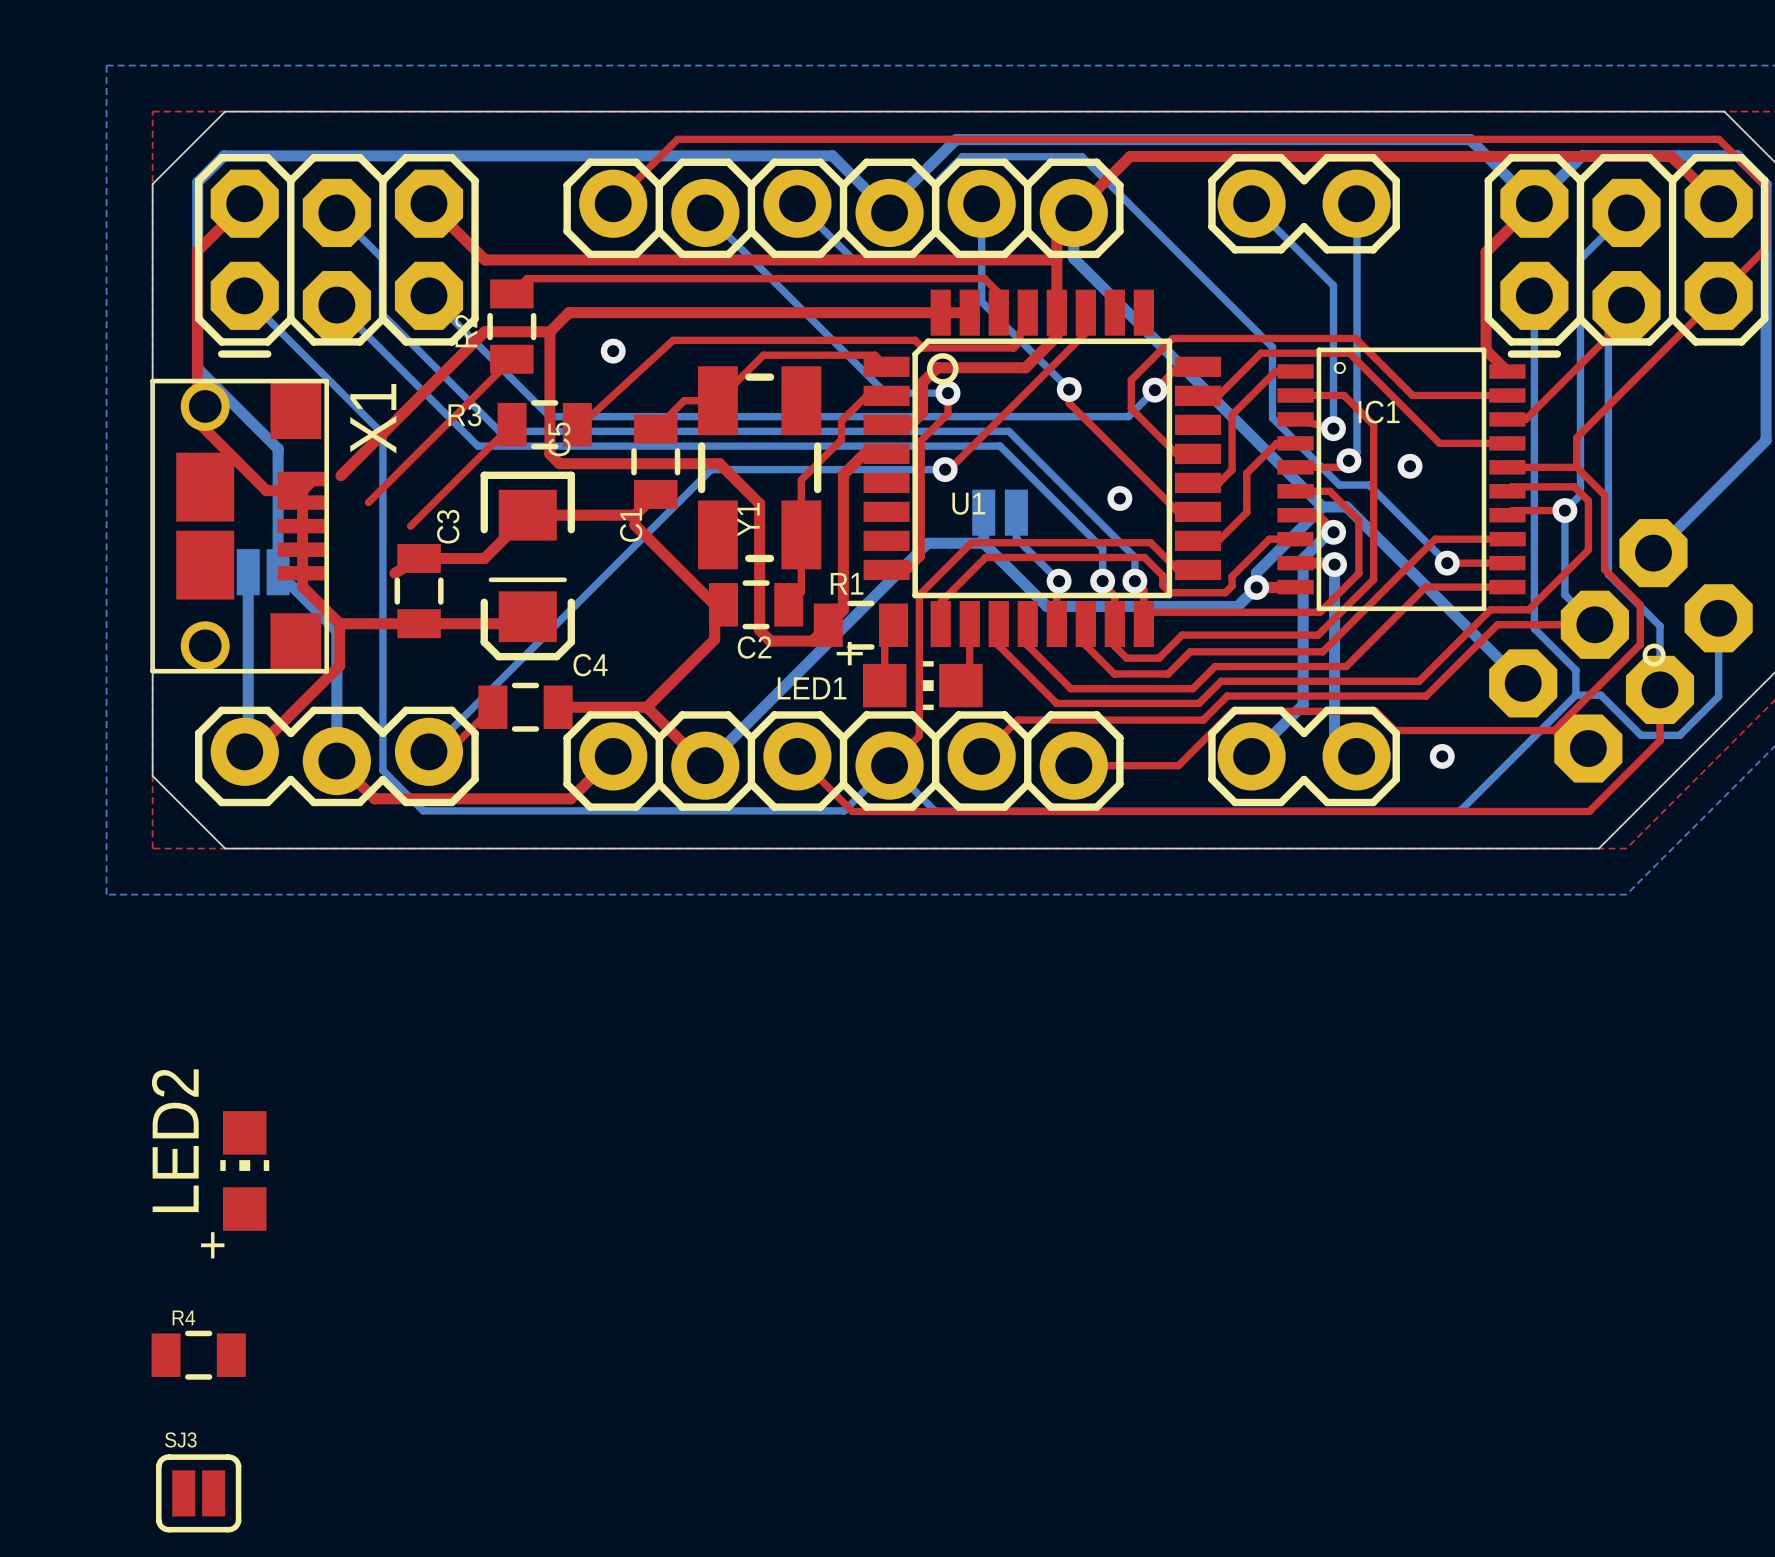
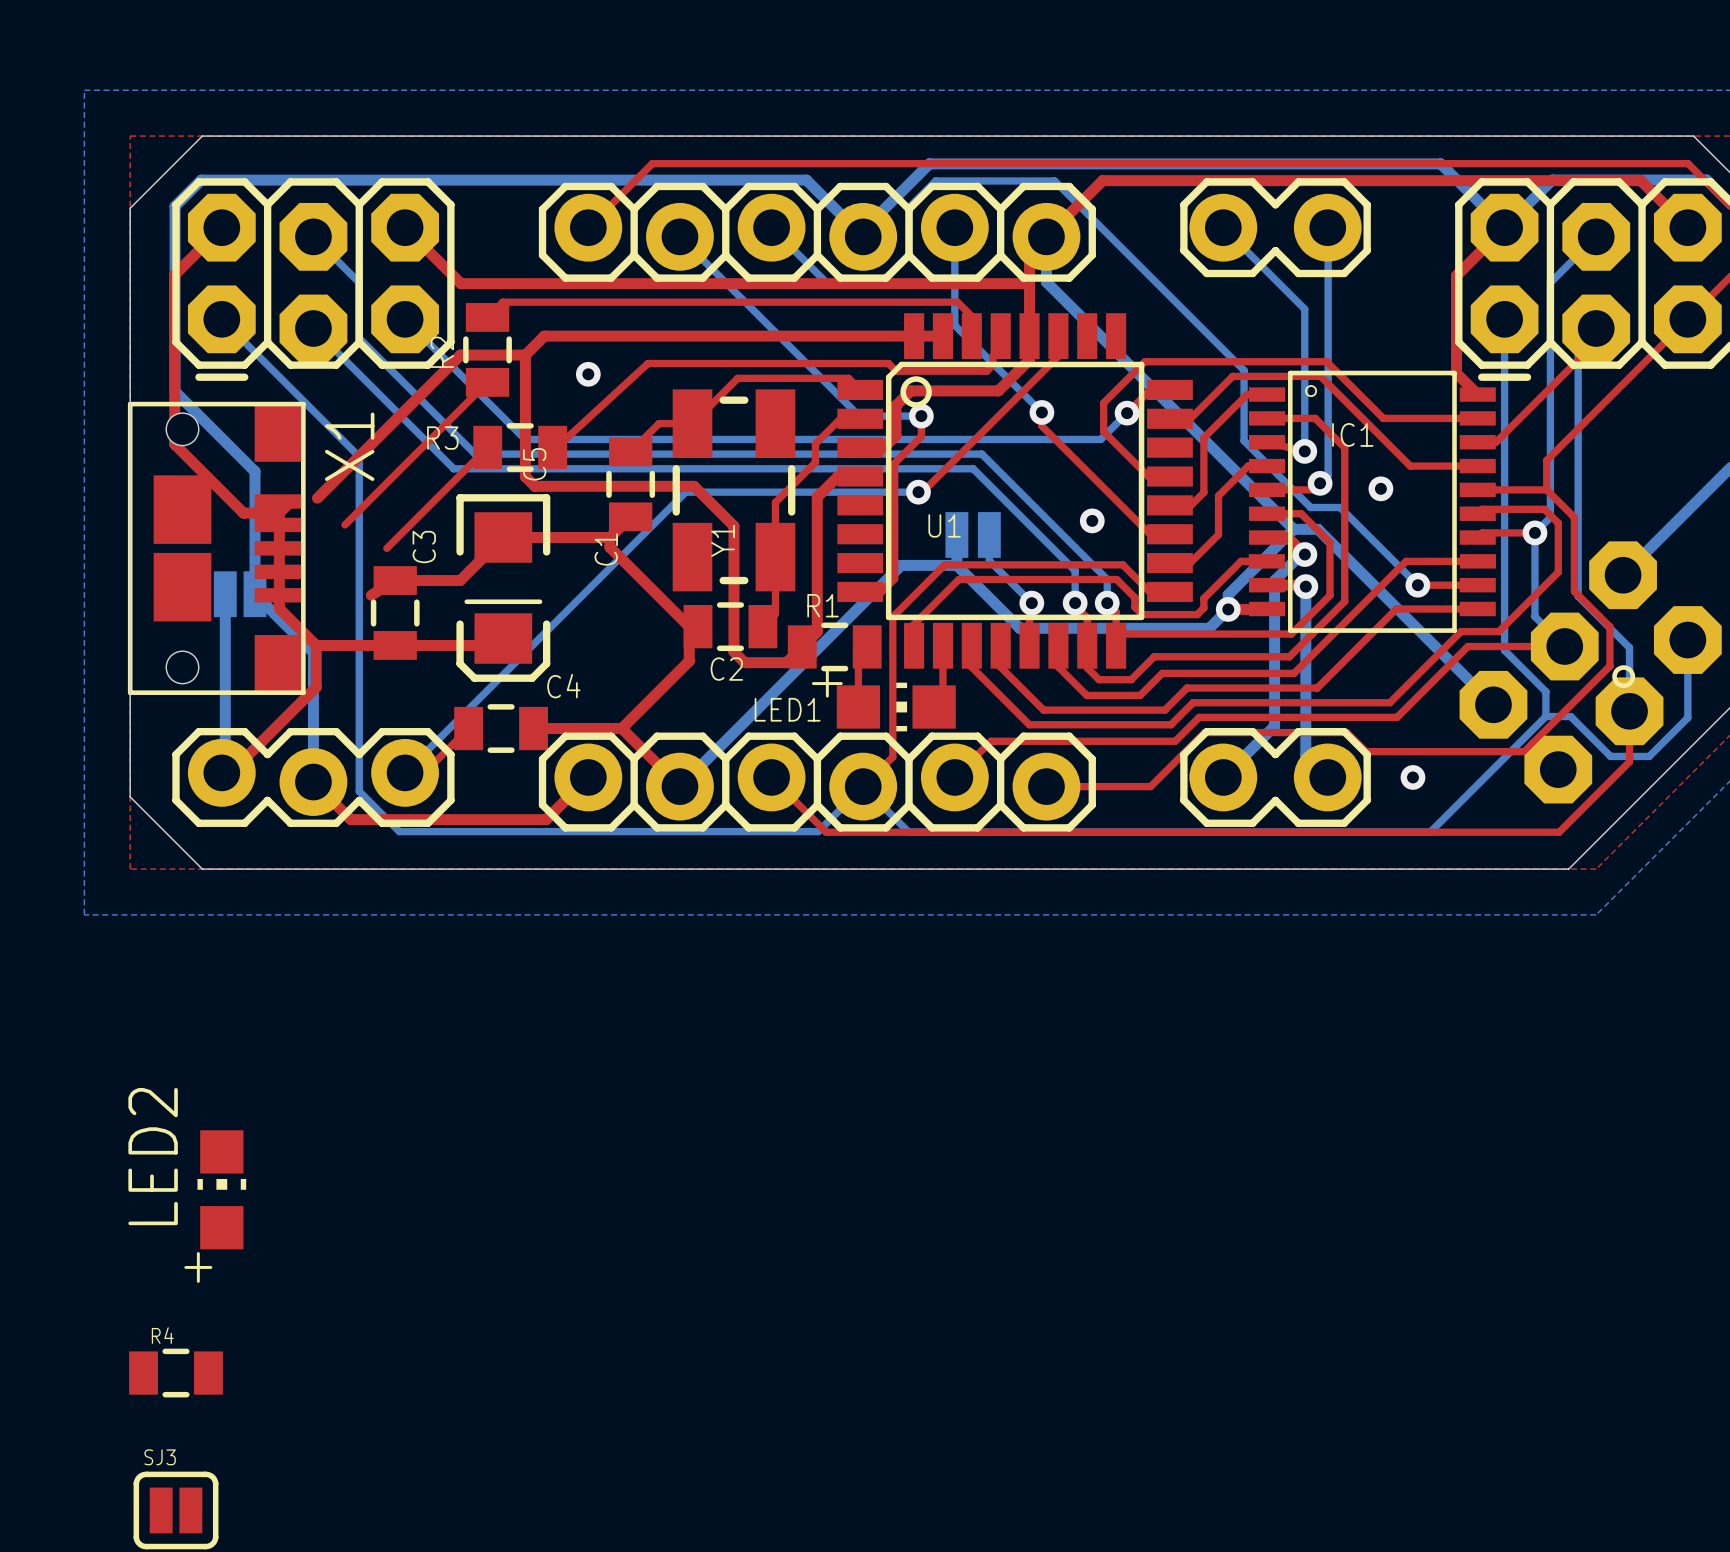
X1 footprint: [150, 378, 330, 674] -> [127, 401, 306, 695]

